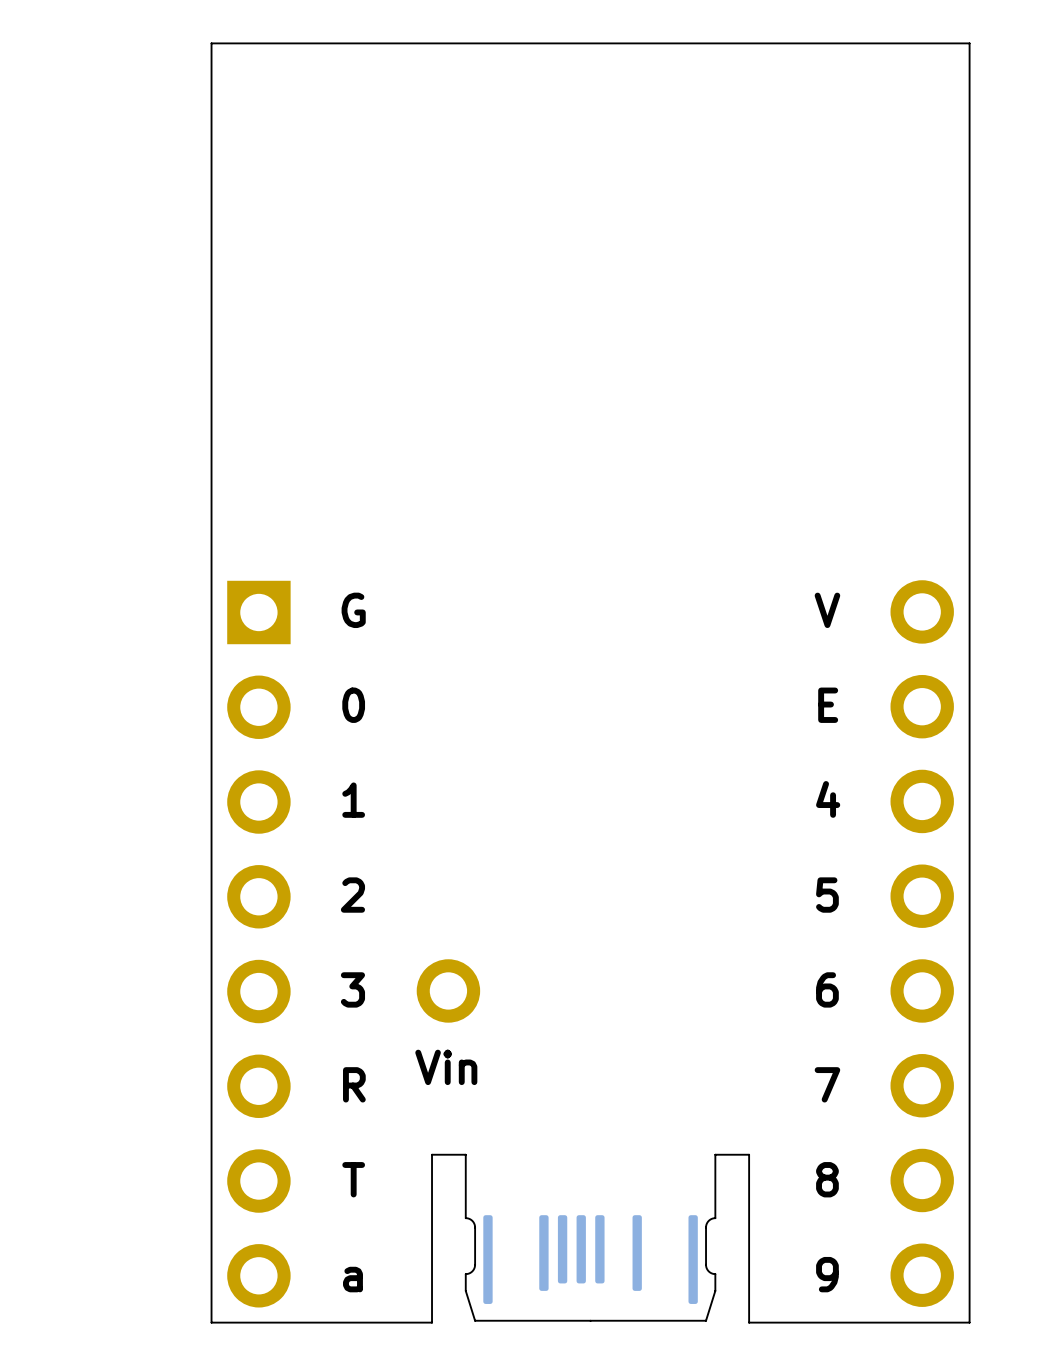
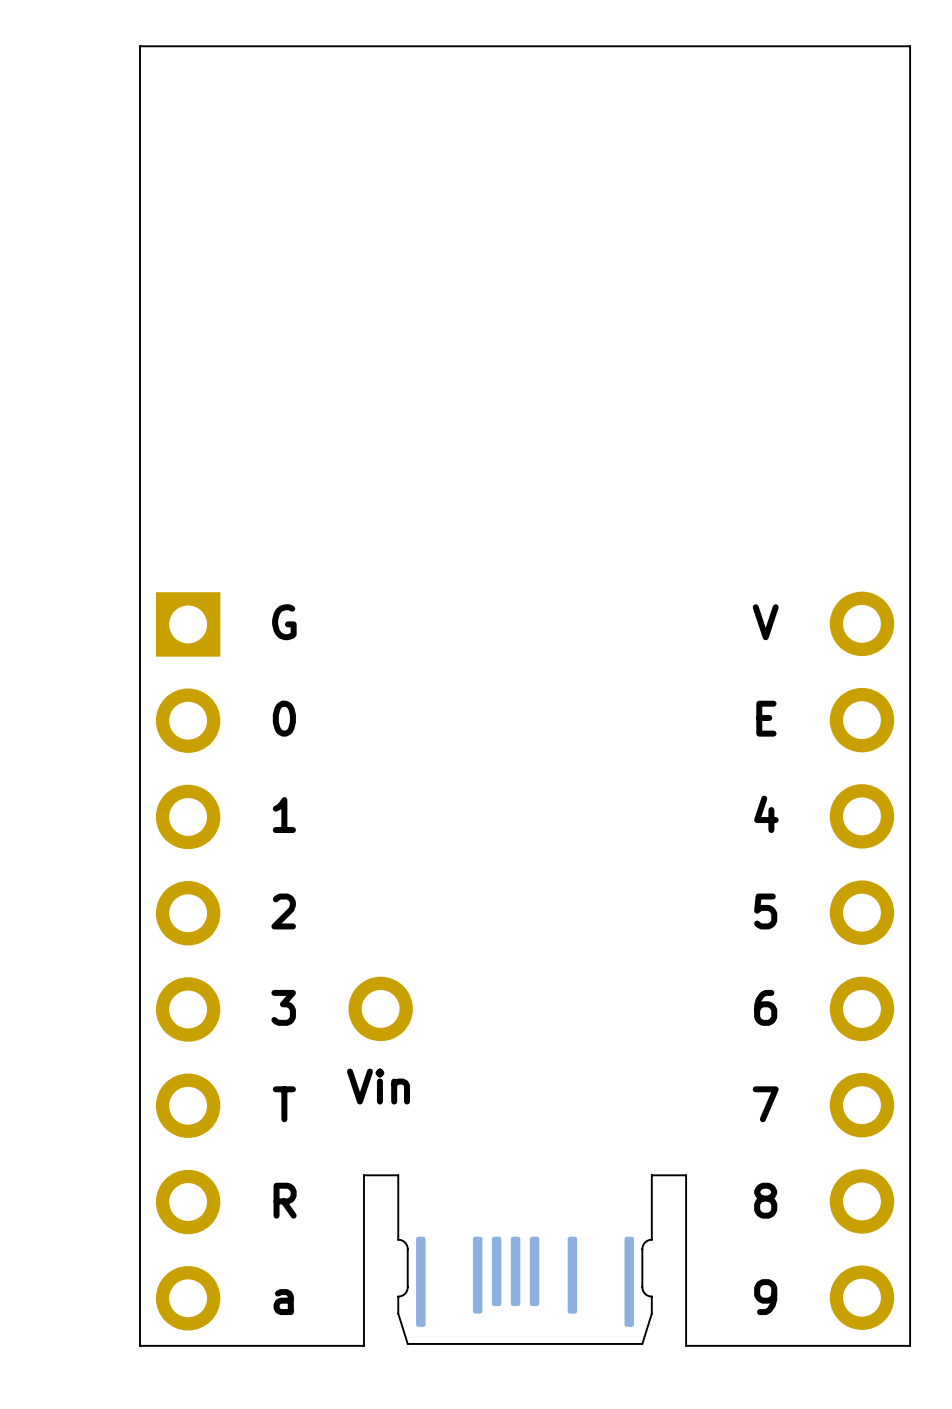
text: R (354, 1084) -> T (284, 1104)
text: T (353, 1179) -> R (285, 1200)

